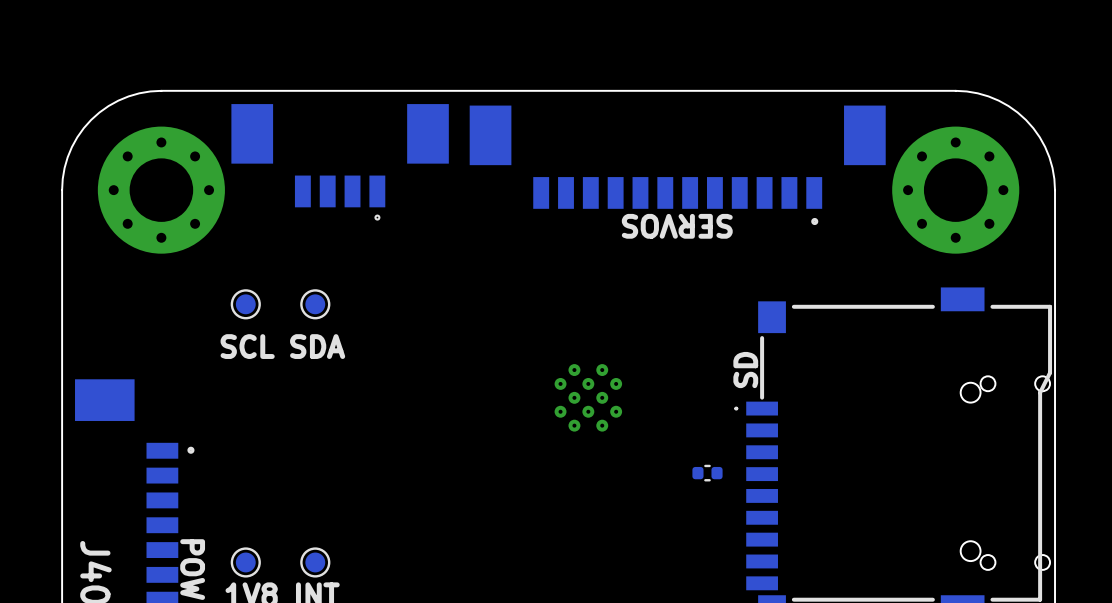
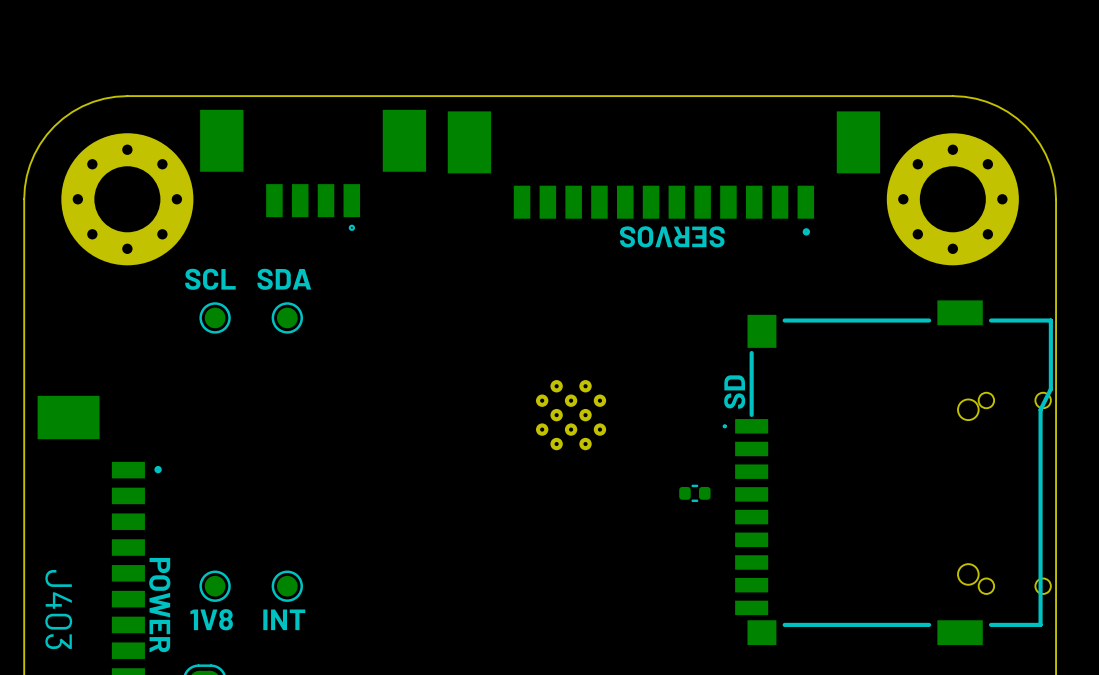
text position: SCL (247, 346) -> SCL (210, 279)
text position: SDA (317, 346) -> SDA (284, 279)

